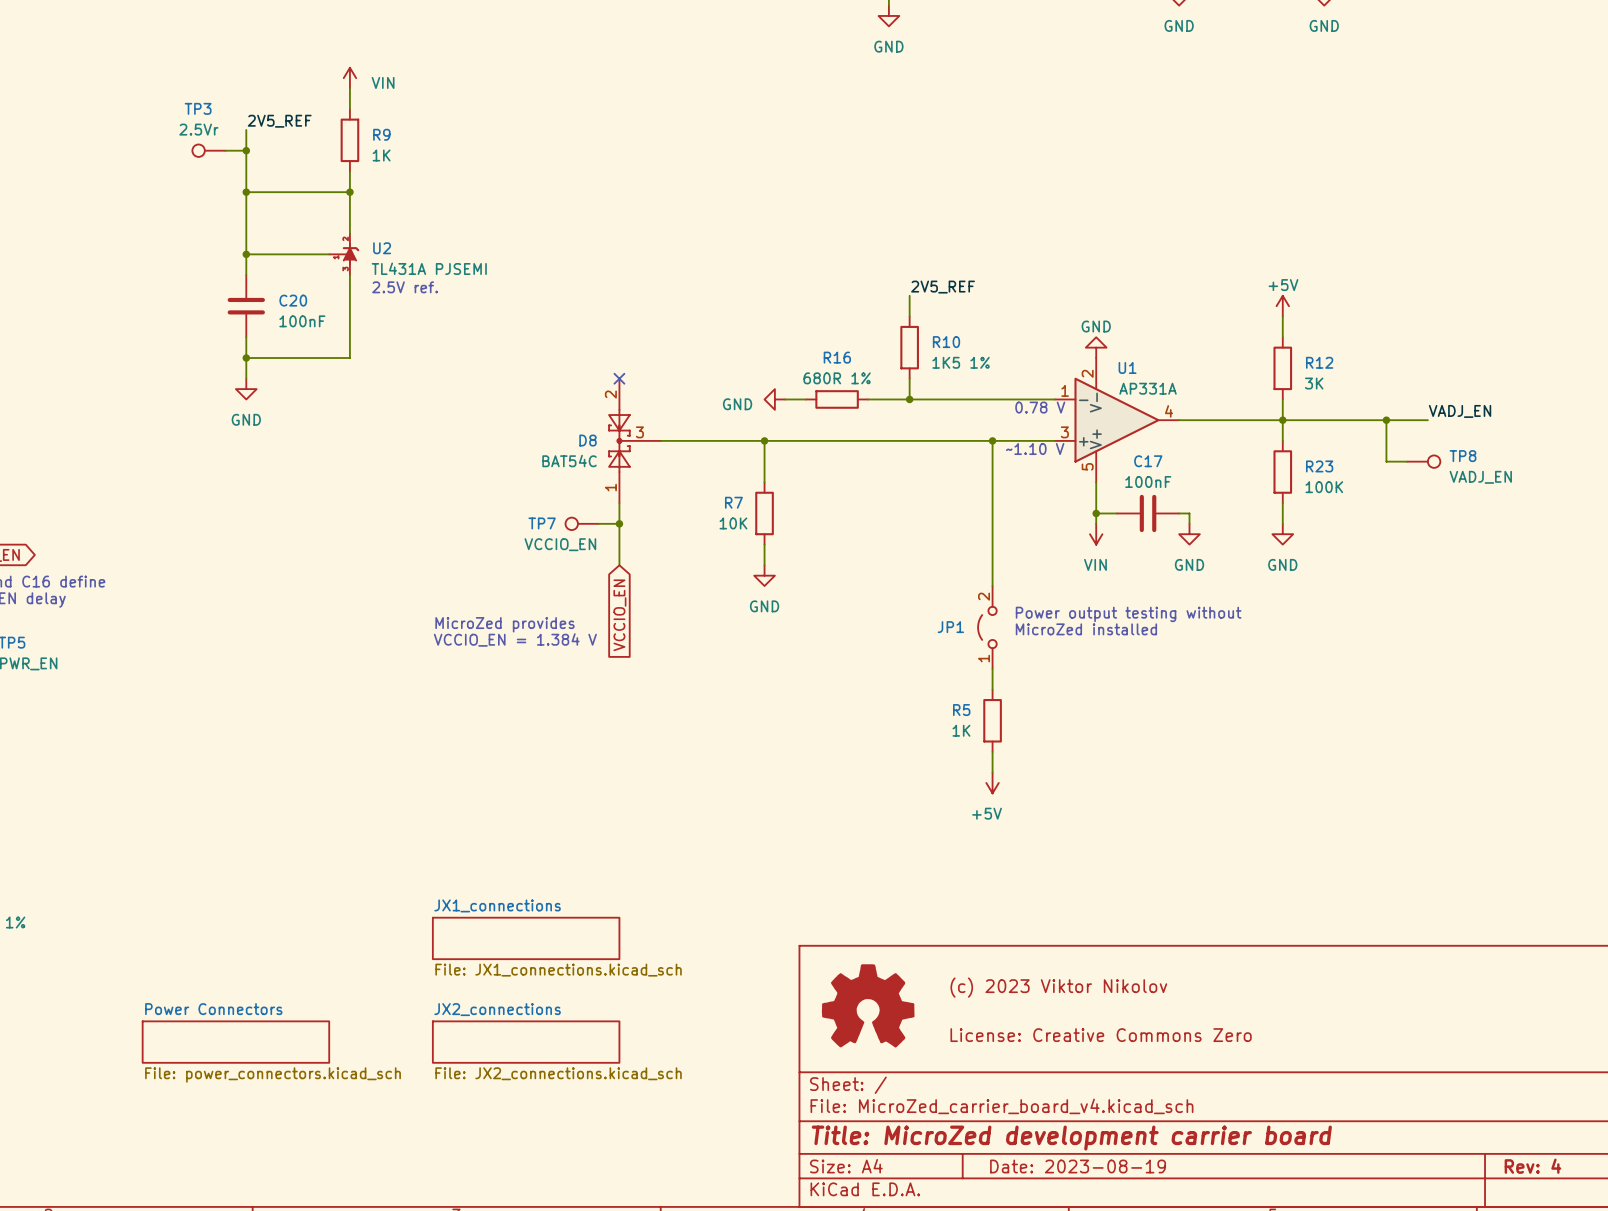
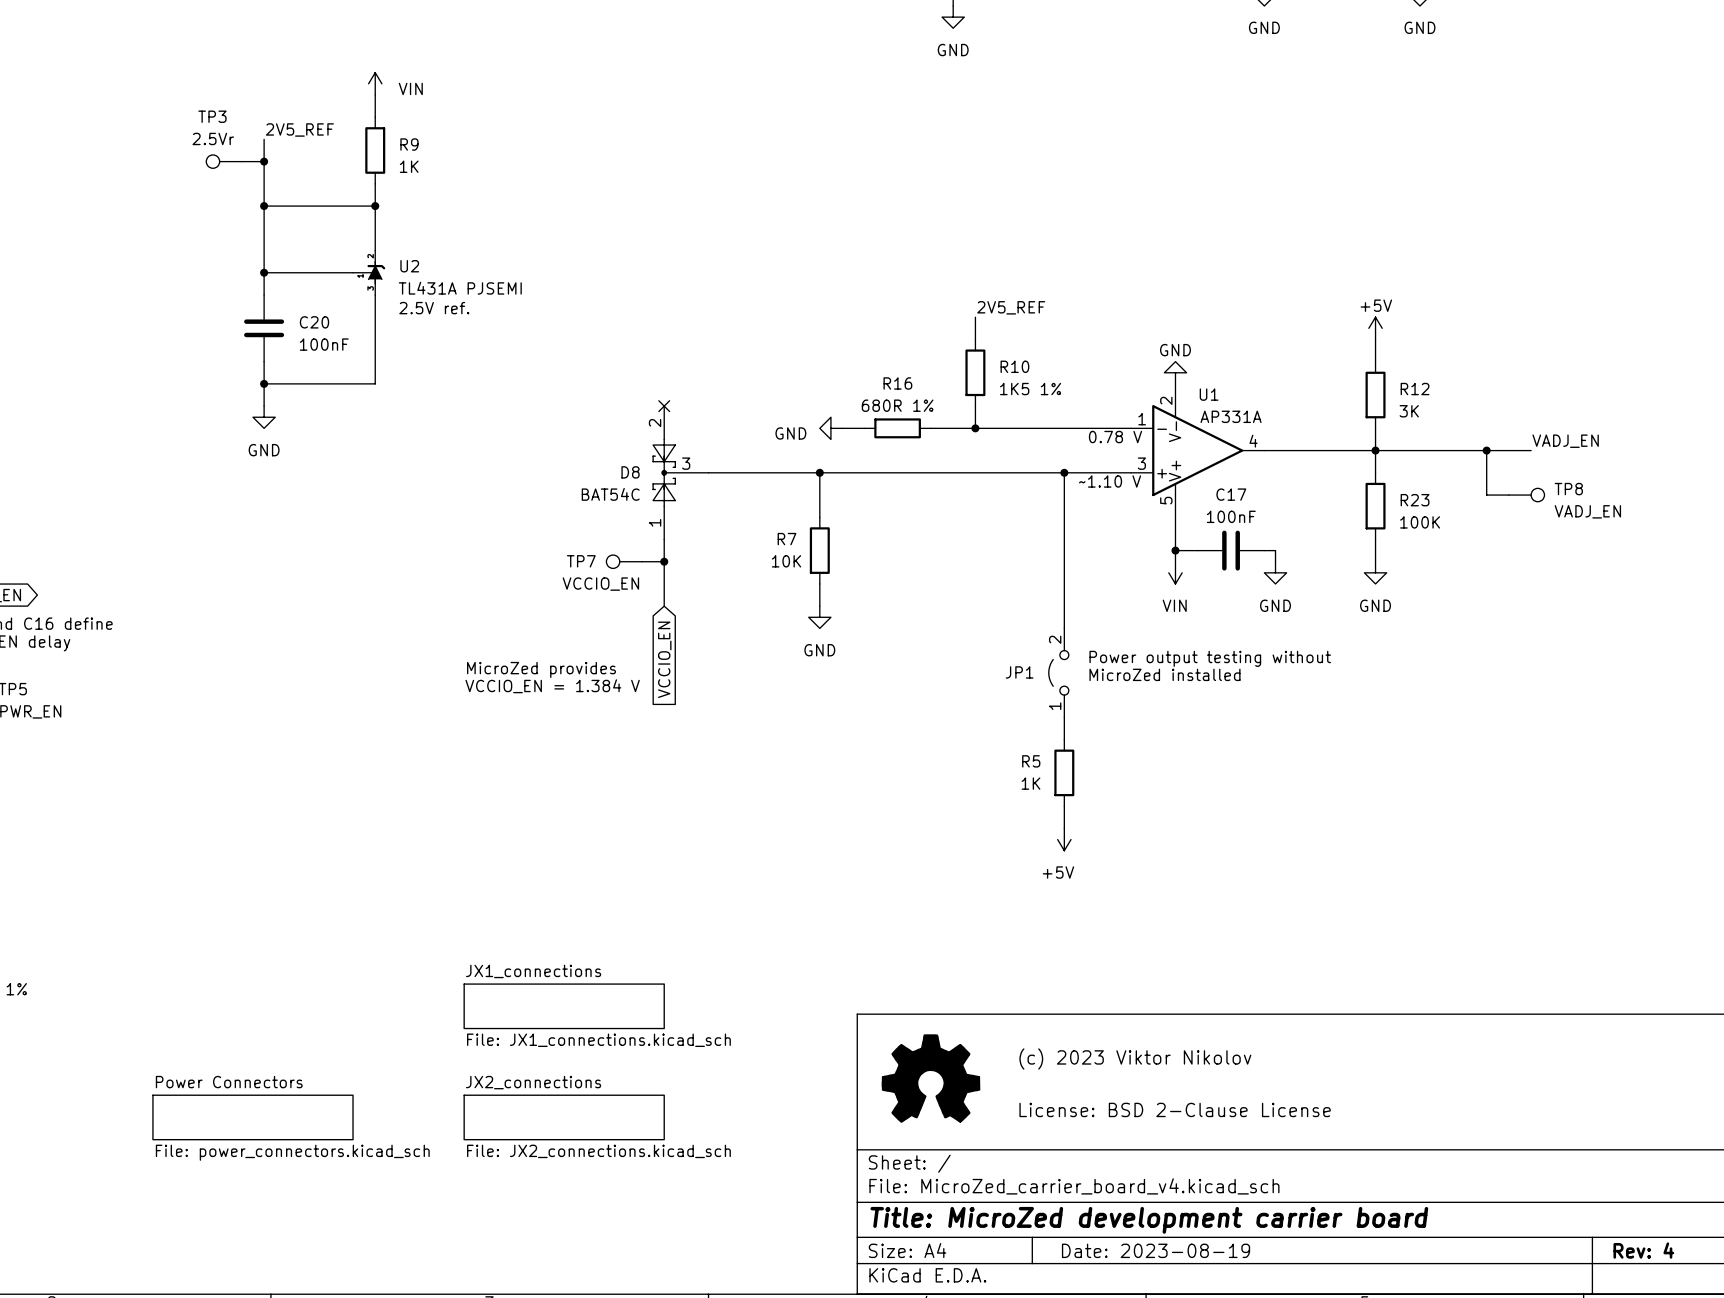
title block: License: Creative Commons Zero (1101, 1035) -> License: BSD 2-Clause License (1175, 1109)

